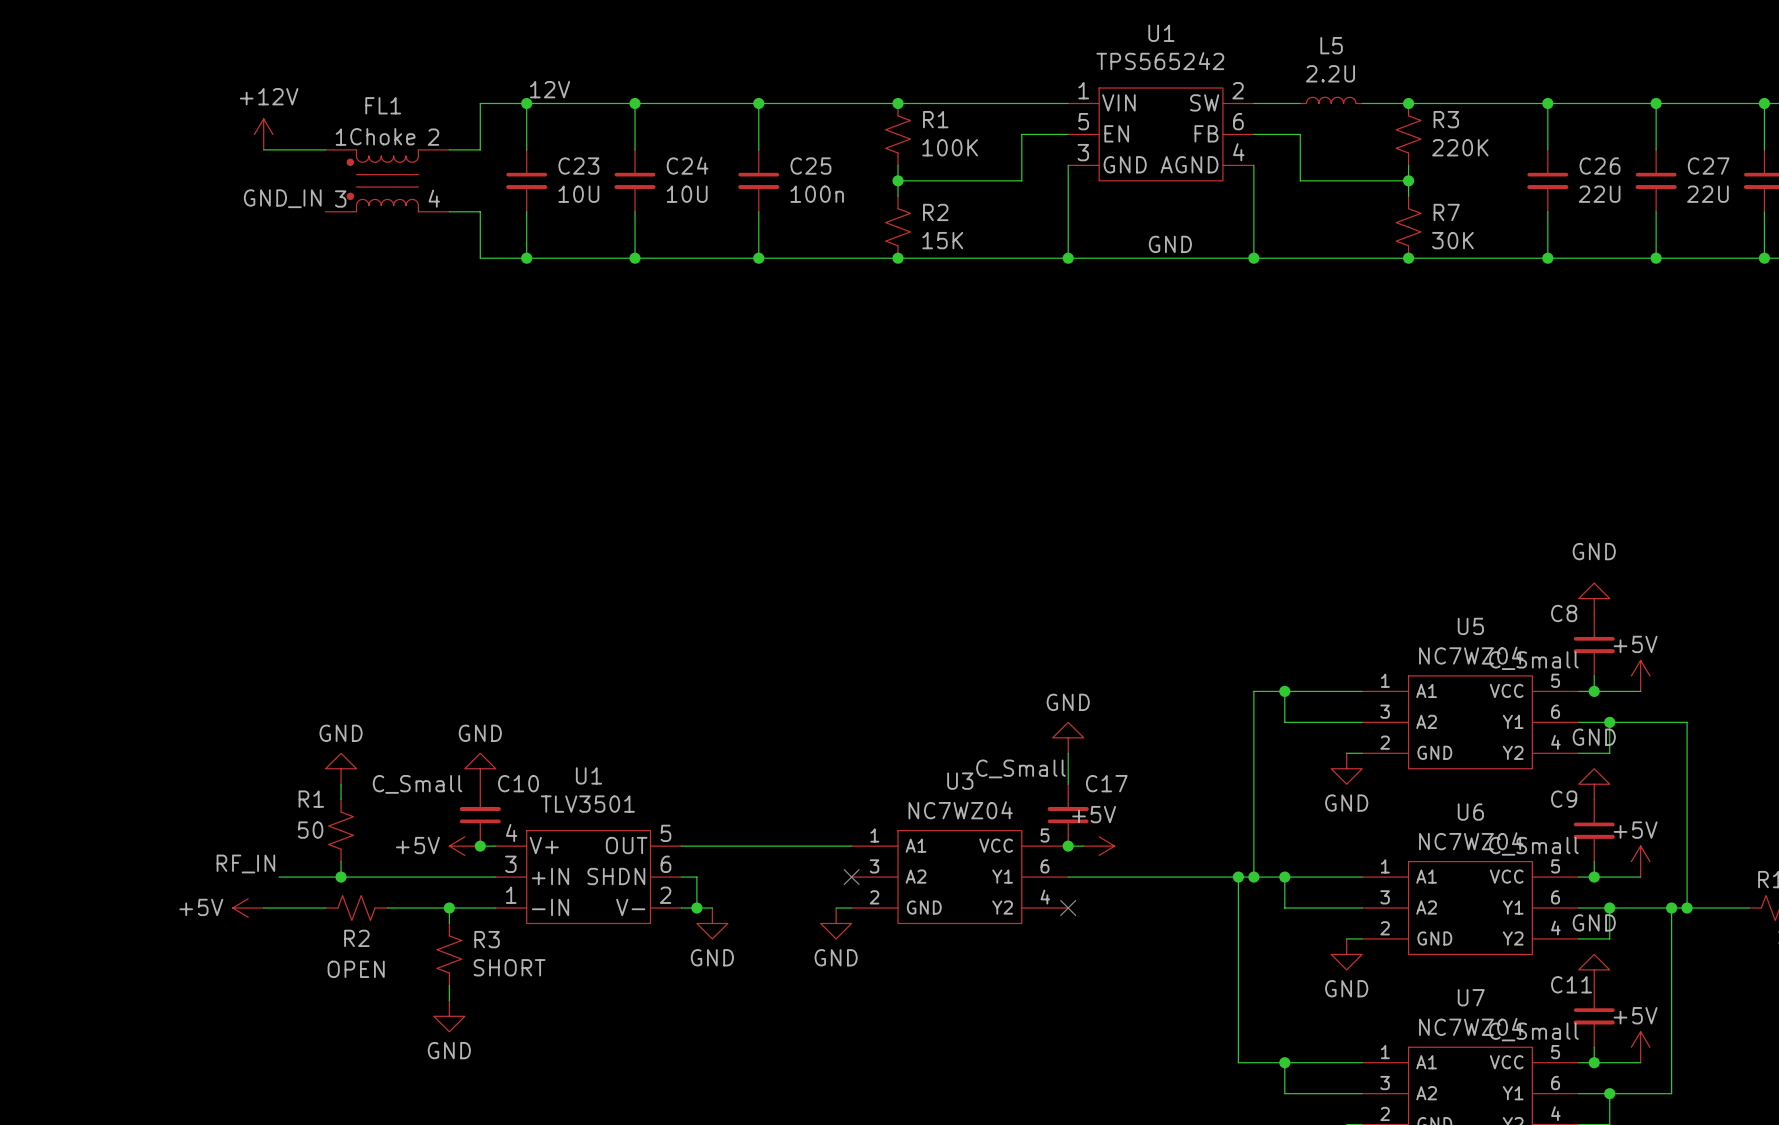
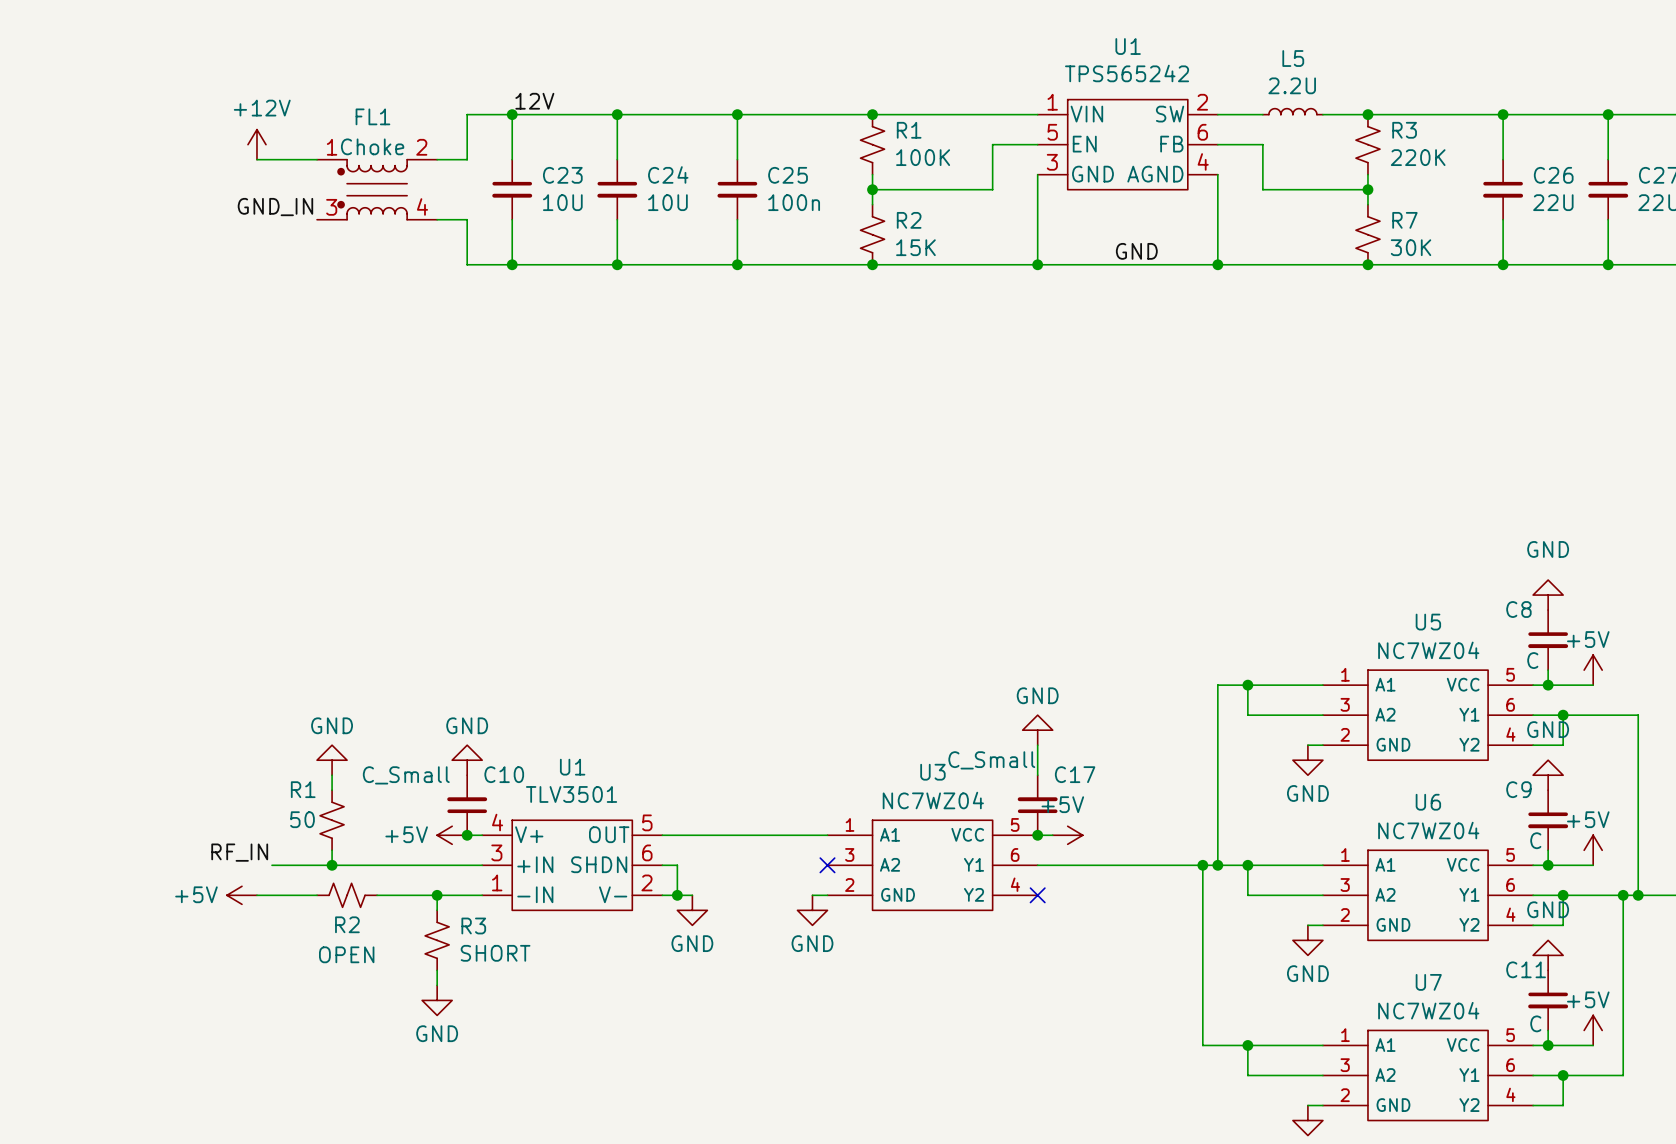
C8 value: C_Small (1533, 660) -> C (1532, 660)
C9 value: C_Small (1533, 846) -> C (1535, 840)
C11 value: C_Small (1533, 1031) -> C (1535, 1023)

